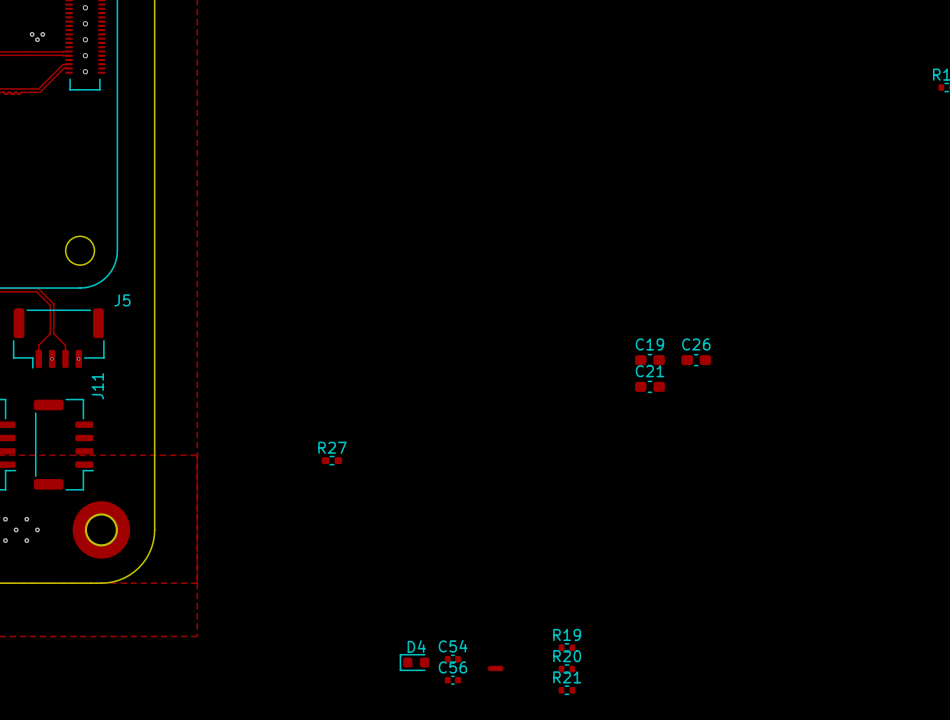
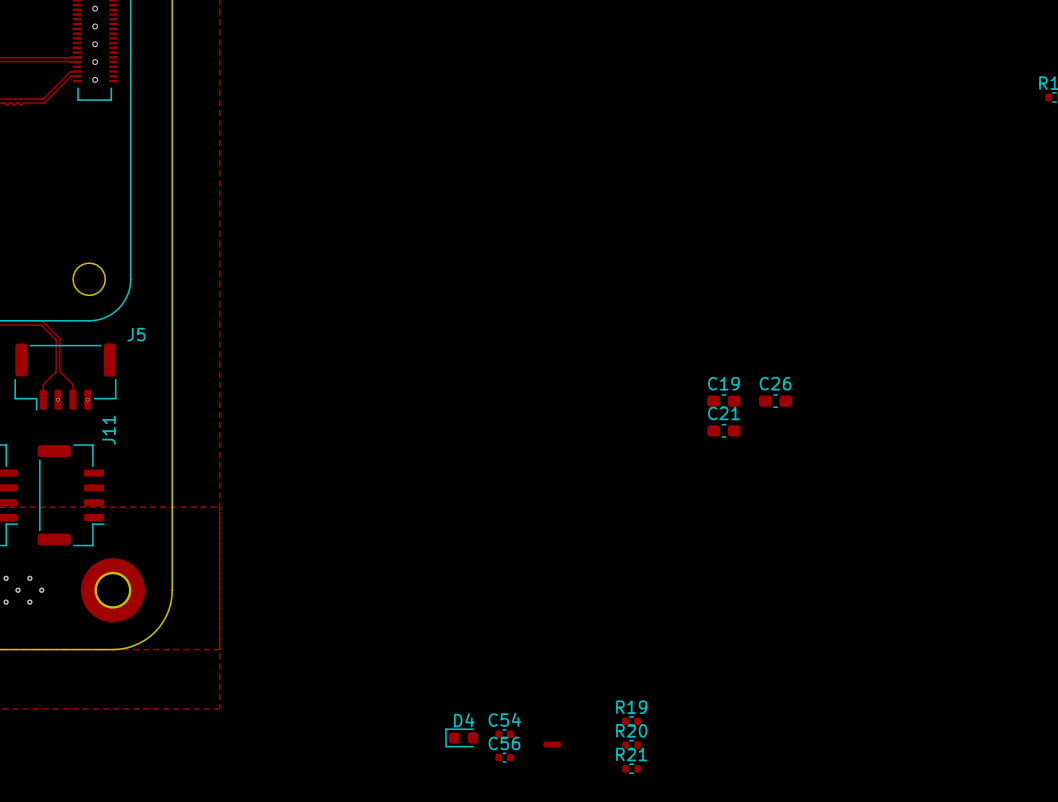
via: (32, 34) -> none
via: (42, 34) -> none
via: (37, 39) -> none
R27: (331, 460) -> none

